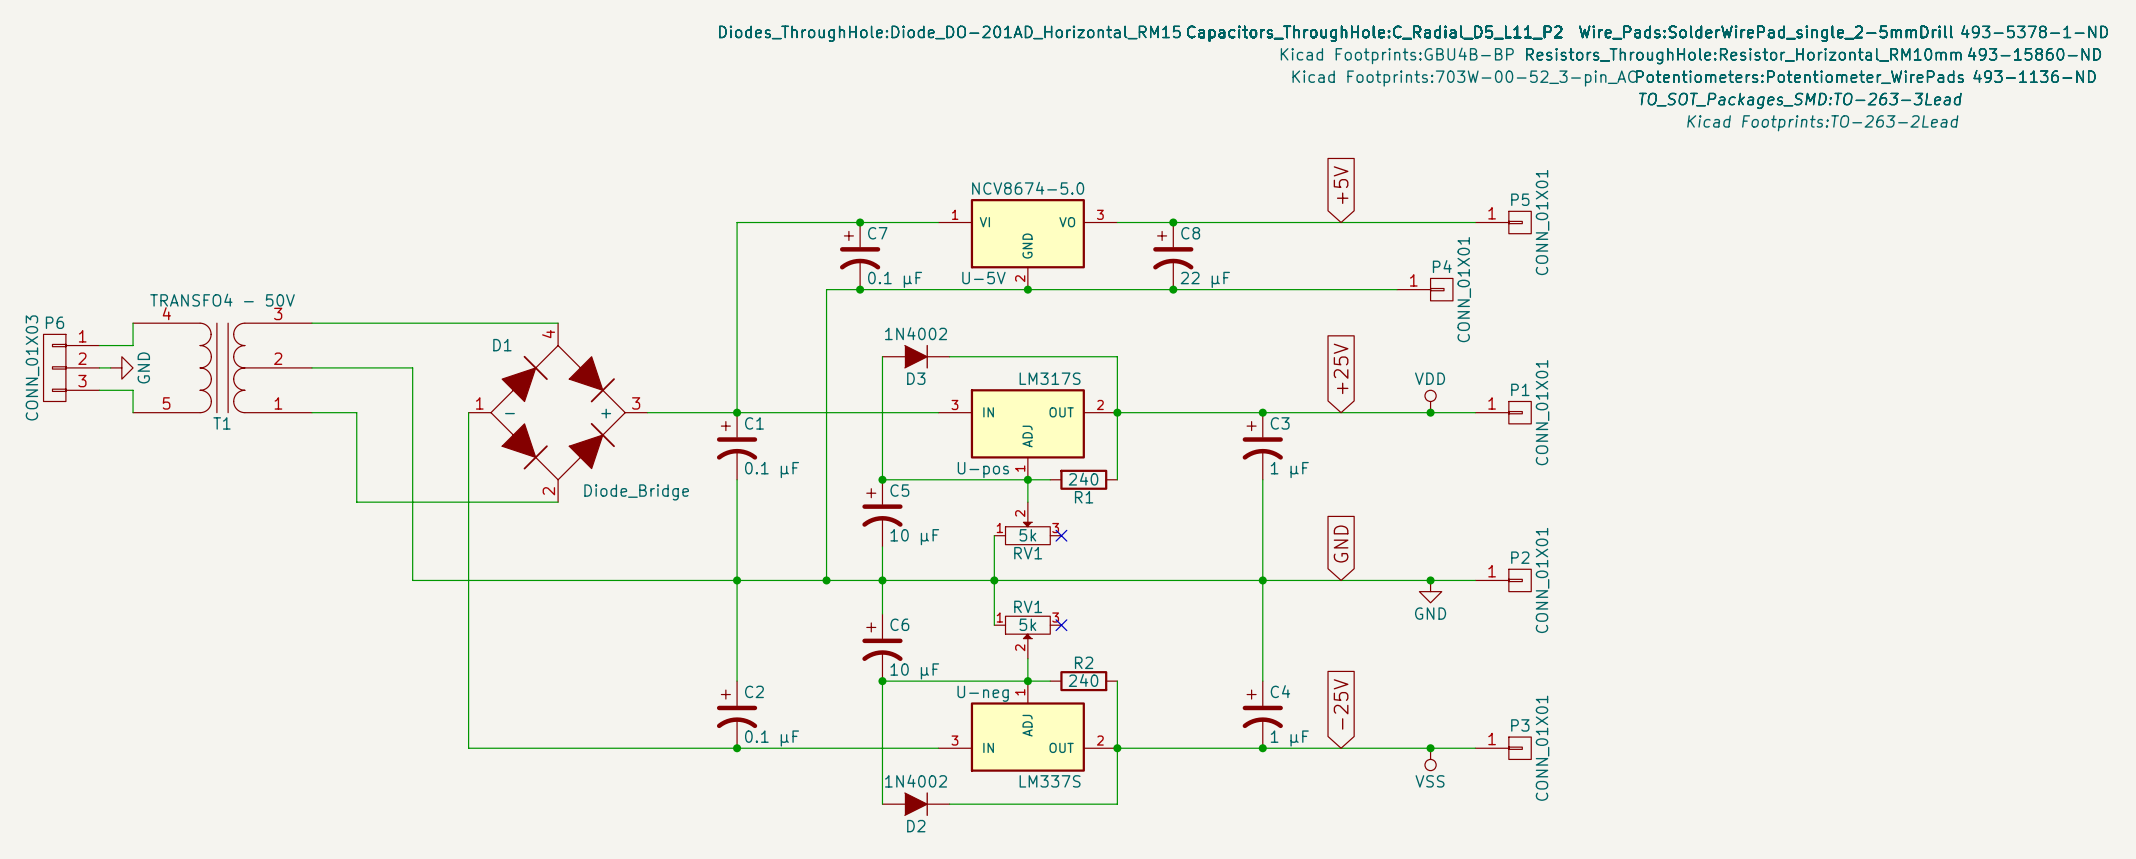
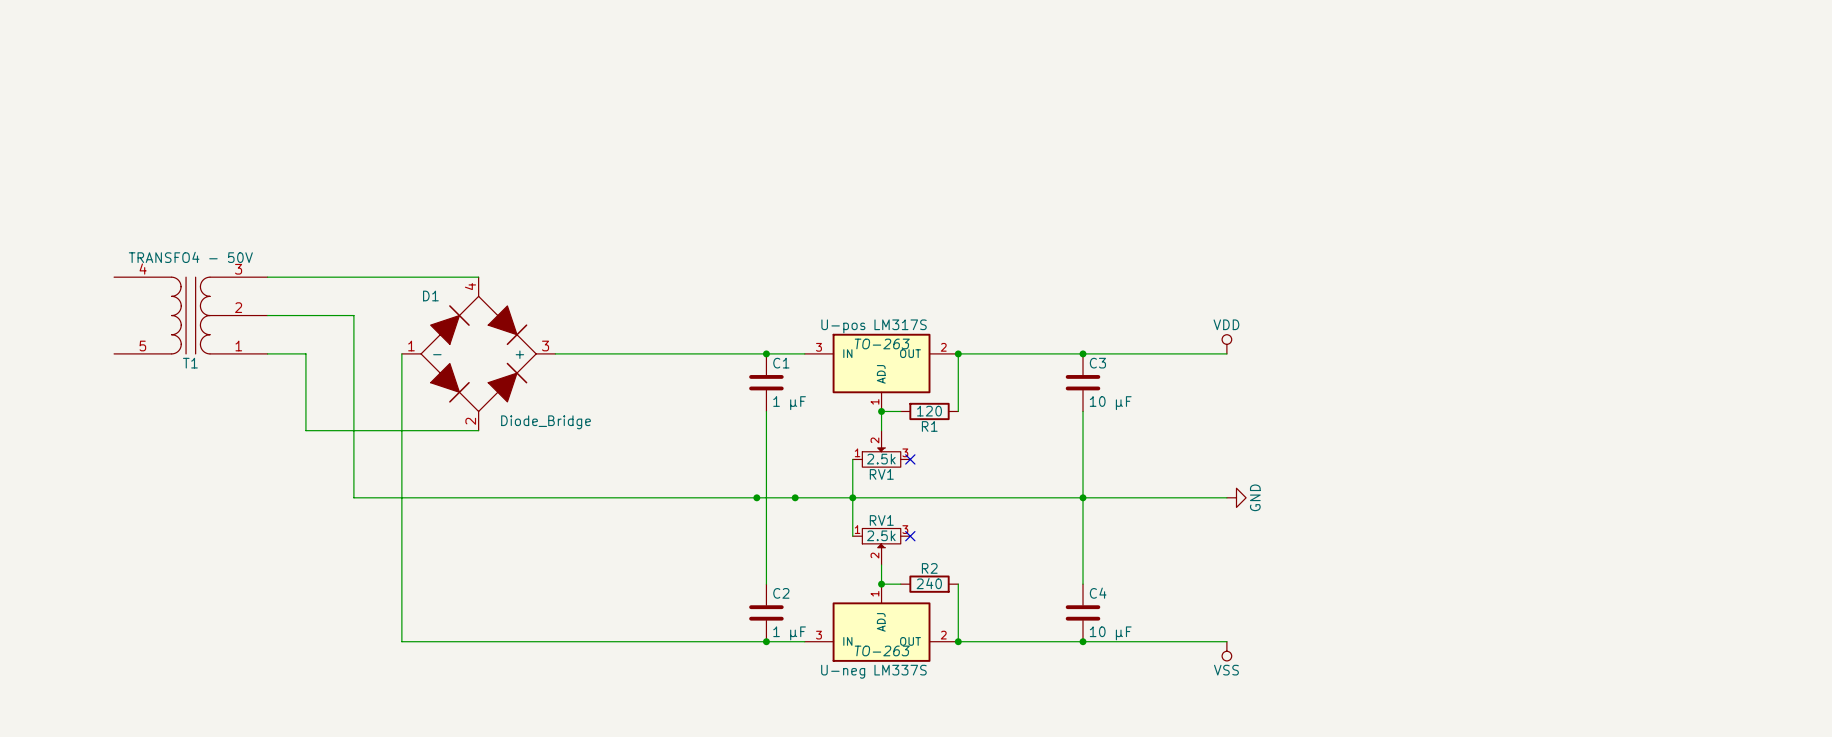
C4 text: 493-5378-1-ND (2034, 31) -> none
C3 text: 493-5378-1-ND (2034, 31) -> none
C1 text: Capacitors_ThroughHole:C_Radial_D5_L11_P2 (1374, 33) -> none
C2 text: Capacitors_ThroughHole:C_Radial_D5_L11_P2 (1374, 33) -> none
C4 text: Capacitors_ThroughHole:C_Radial_D5_L11_P2 (1374, 33) -> none
C3 text: Capacitors_ThroughHole:C_Radial_D5_L11_P2 (1374, 33) -> none
D1 text: Kicad Footprints:GBU4B-BP (1397, 55) -> none
R1 text: Resistors_ThroughHole:Resistor_Horizontal_RM10mm (1743, 56) -> none
R2 text: Resistors_ThroughHole:Resistor_Horizontal_RM10mm (1743, 56) -> none
C1 text: 493-1136-ND (2034, 76) -> none
C2 text: 493-1136-ND (2034, 76) -> none
RV1 text: Potentiometers:Potentiometer_WirePads (1799, 77) -> none
RV1 text: Potentiometers:Potentiometer_WirePads (1799, 77) -> none
U-pos text: TO_SOT_Packages_SMD:TO-263-3Lead (1800, 100) -> TO-263 (882, 343)
U-neg text: TO_SOT_Packages_SMD:TO-263-3Lead (1800, 100) -> TO-263 (882, 650)
global label: +5V (1341, 185) -> none
junction: (860, 222) -> none
wire: (938, 222) (737, 222) (737, 412) -> none
wire: (1117, 222) (1475, 222) -> none
junction: (1173, 222) -> none
P5: CONN_01X01 (1503, 222) -> none
U-5V: NCV8674-5.0 (1027, 244) -> none
C7: 0.1 μF (860, 256) -> none
C8: 22 μF (1173, 256) -> none
junction: (860, 289) -> none
junction: (1027, 289) -> none
junction: (1173, 289) -> none
wire: (1397, 289) (826, 289) (826, 580) -> none
P4: CONN_01X01 (1424, 289) -> none
wire: (133, 323) (133, 345) (99, 345) -> none
wire: (882, 356) (882, 479) (1027, 479) -> none
D3: 1N4002 (916, 356) -> none
wire: (949, 356) (1117, 356) (1117, 412) -> none
P6: CONN_01X03 (71, 367) -> none
wire: (99, 367) (110, 367) -> none
power symbol: GND (121, 367) -> none
global label: +25V (1341, 368) -> none
wire: (99, 390) (133, 390) (133, 412) -> none
C1 symbol: [716, 412, 758, 480] -> [749, 353, 784, 412]
junction: (737, 412) -> none
junction: none -> (766, 353)
C3 symbol: [1242, 412, 1283, 480] -> [1065, 353, 1101, 412]
wire: (1430, 412) (1475, 412) -> none
junction: (1430, 412) -> none
P1: CONN_01X01 (1503, 412) -> none
C1 value: 0.1 μF (772, 470) -> 1 μF (789, 403)
U-pos name position: U-pos (983, 470) -> U-pos (843, 326)
C3 value: 1 μF (1289, 470) -> 10 μF (1110, 403)
wire: (737, 479) (737, 681) -> (766, 411) (766, 584)
junction: (882, 479) -> none
R1 value: 240 (1083, 479) -> 120 (929, 411)
C5: 10 μF (882, 513) -> none
RV1 value: 5k (1027, 535) -> 2.5k (881, 459)
global label: GND (1341, 544) -> none
wire: (882, 546) (882, 614) -> none
junction: (737, 580) -> none
junction: (826, 580) -> none
junction: none -> (795, 497)
wire: (1430, 580) (1475, 580) -> none
junction: (1430, 580) -> none
P2: CONN_01X01 (1503, 580) -> none
power symbol rotation: 0° (1430, 591) -> 90° counterclockwise (1236, 497)
power symbol position: GND (1430, 591) -> GND (1236, 497)
RV1 value: 5k (1027, 624) -> 2.5k (881, 535)
C6: 10 μF (882, 647) -> none
C2 symbol: [716, 681, 758, 749] -> [749, 584, 784, 642]
junction: (882, 681) -> none
wire: (1027, 681) (882, 681) (882, 804) -> none
C4 symbol: [1242, 681, 1283, 749] -> [1065, 584, 1101, 642]
U-neg name position: U-neg (983, 693) -> U-neg (843, 671)
global label: -25V (1341, 704) -> none
C2 value: 0.1 μF (772, 738) -> 1 μF (789, 633)
C4 value: 1 μF (1289, 738) -> 10 μF (1110, 633)
junction: (737, 748) -> none
junction: none -> (766, 641)
wire: (1117, 748) (1117, 804) (949, 804) -> none
wire: (1430, 748) (1475, 748) -> none
junction: (1430, 748) -> none
P3: CONN_01X01 (1503, 748) -> none
D2: 1N4002 (916, 804) -> none

